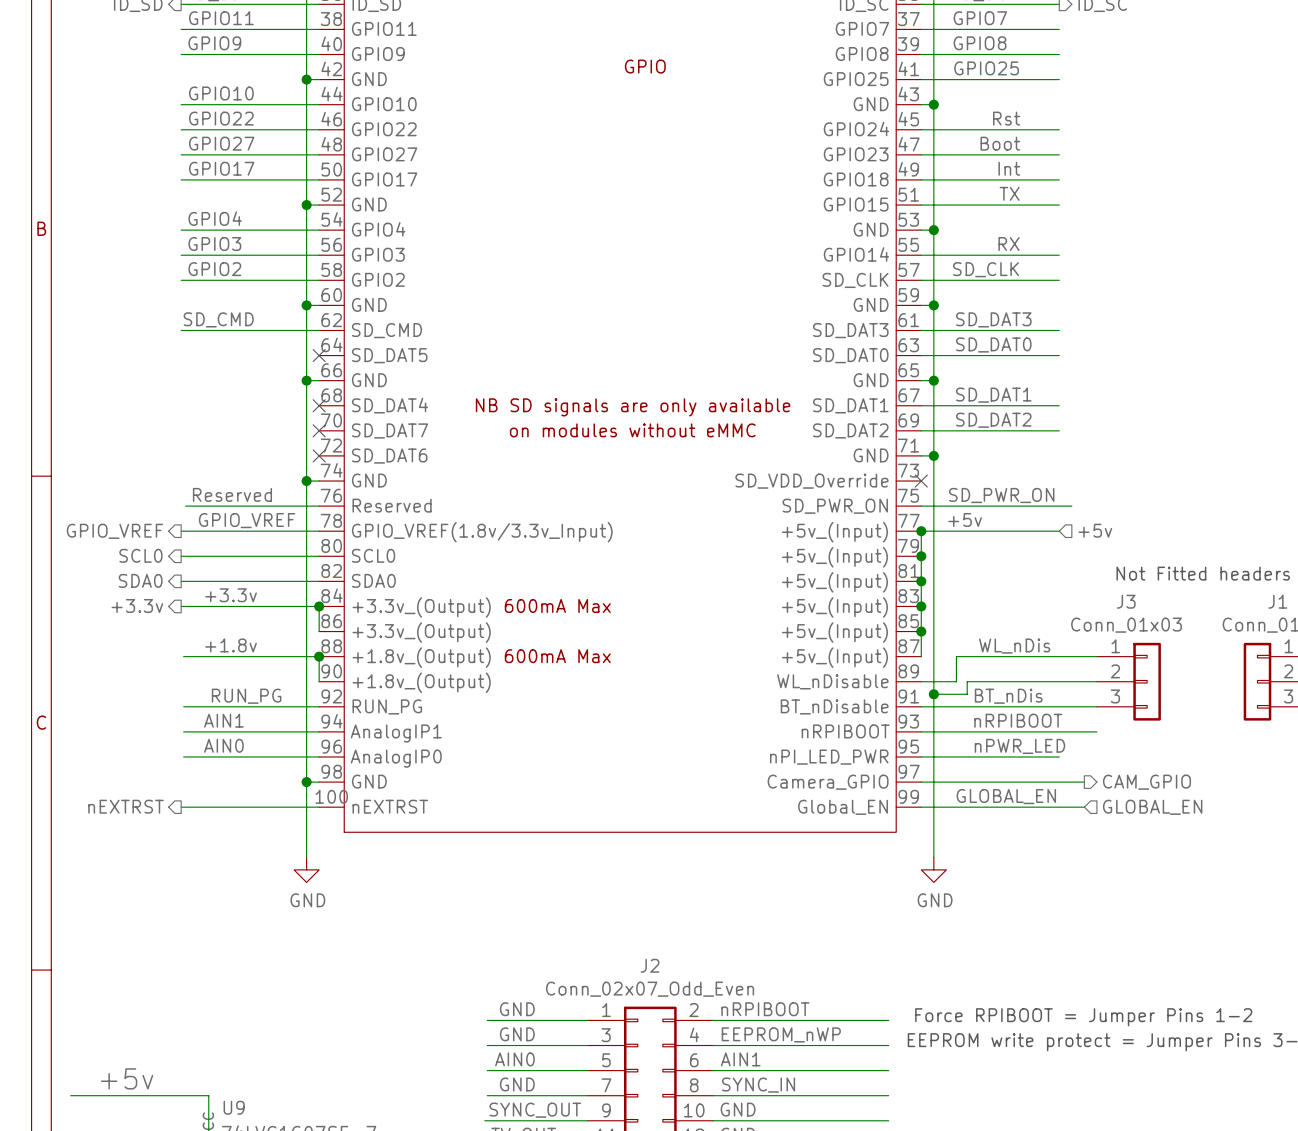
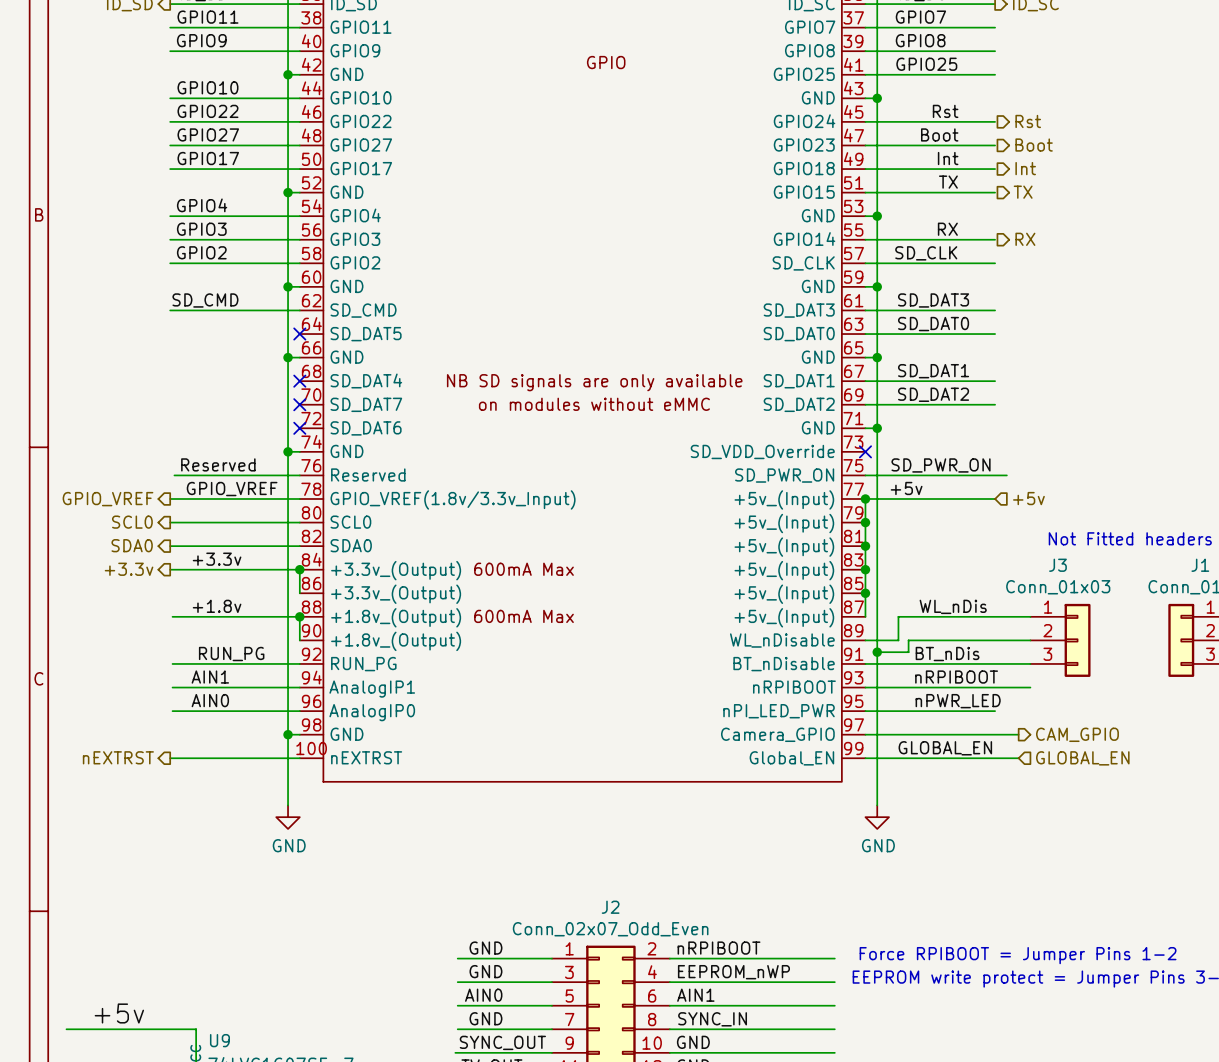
hierarchical label: none -> Rst (1028, 121)
hierarchical label: none -> Boot (1034, 145)
hierarchical label: none -> Int (1025, 168)
hierarchical label: none -> TX (1023, 192)
hierarchical label: none -> RX (1025, 239)

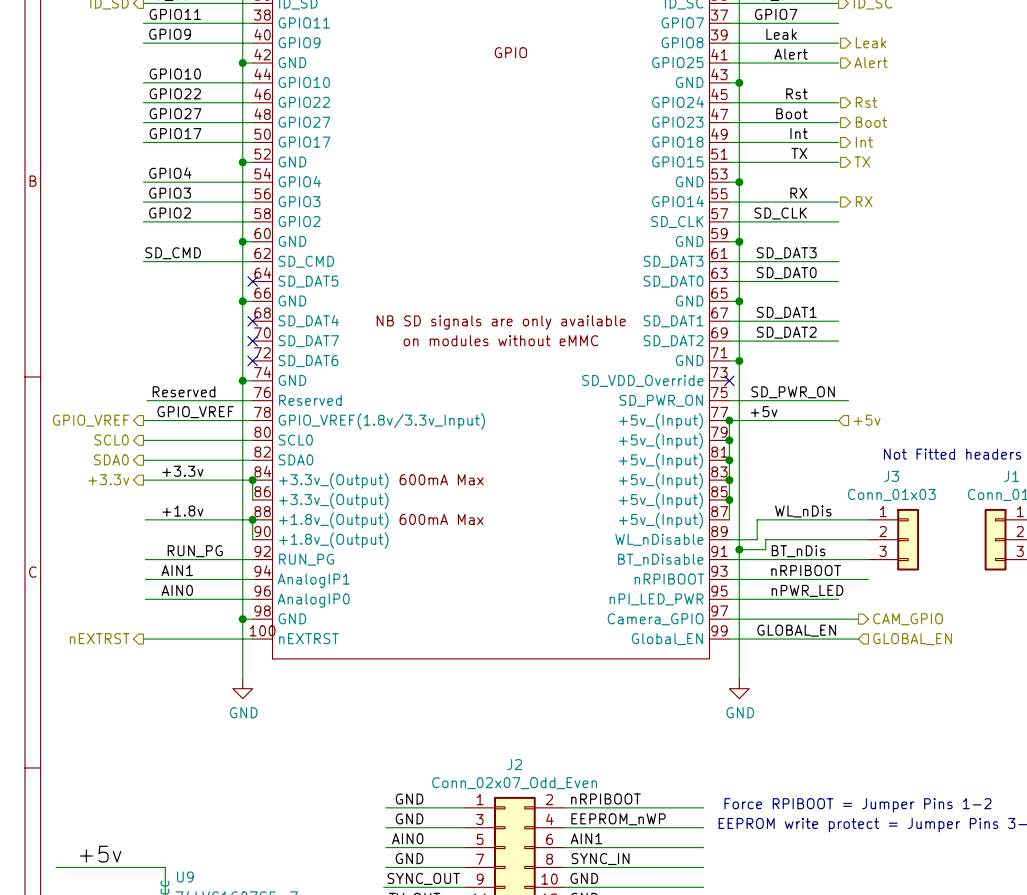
label: GPIO8 (920, 40) -> Leak (781, 34)
hierarchical label: none -> Leak (871, 42)
label: GPIO25 (926, 64) -> Alert (791, 54)
hierarchical label: none -> Alert (871, 62)

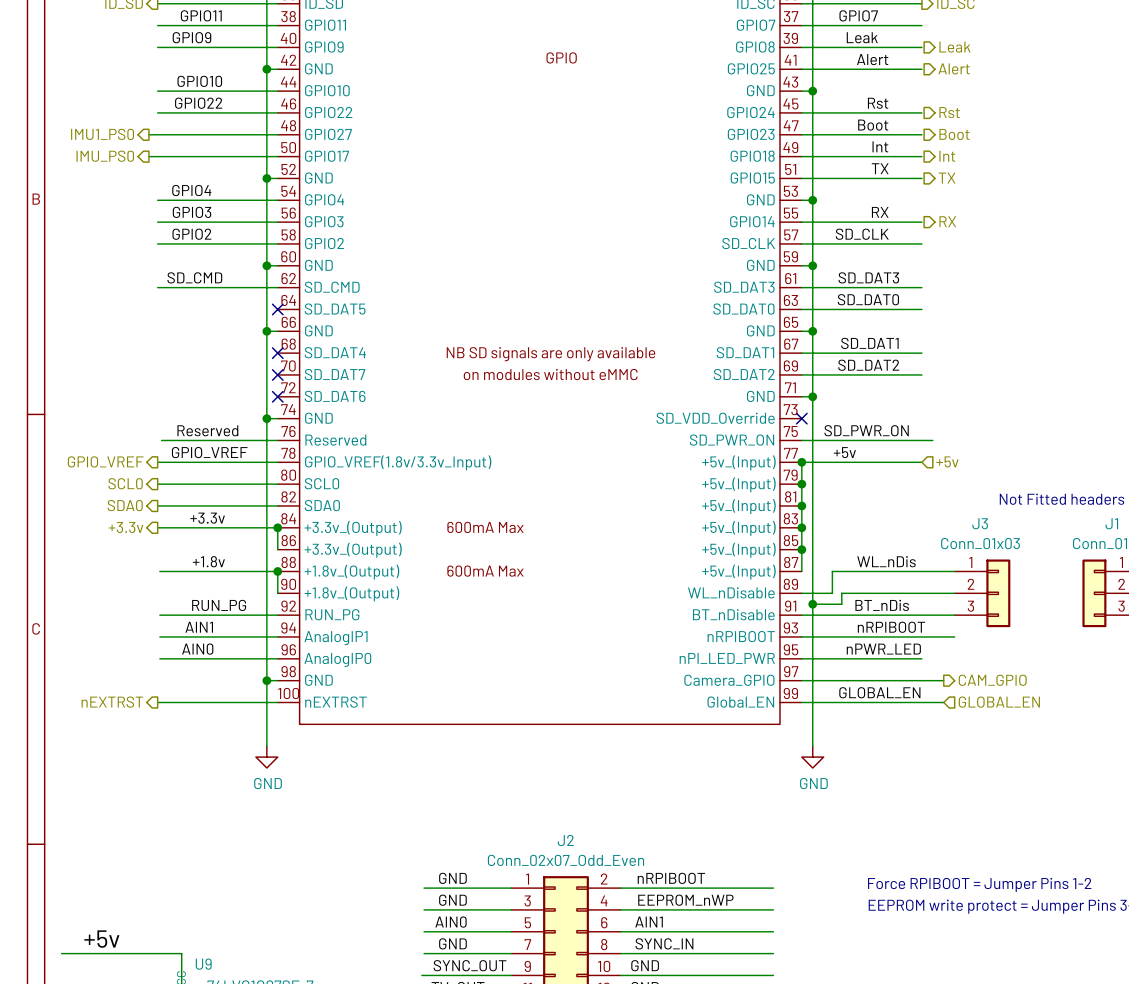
label: GPIO27 (175, 113) -> none
hierarchical label: none -> IMU1_PS0 (102, 134)
wire: none -> (148, 134) (157, 134)
label: GPIO17 (175, 133) -> none
hierarchical label: none -> IMU_PS0 (105, 156)
wire: none -> (148, 156) (157, 156)

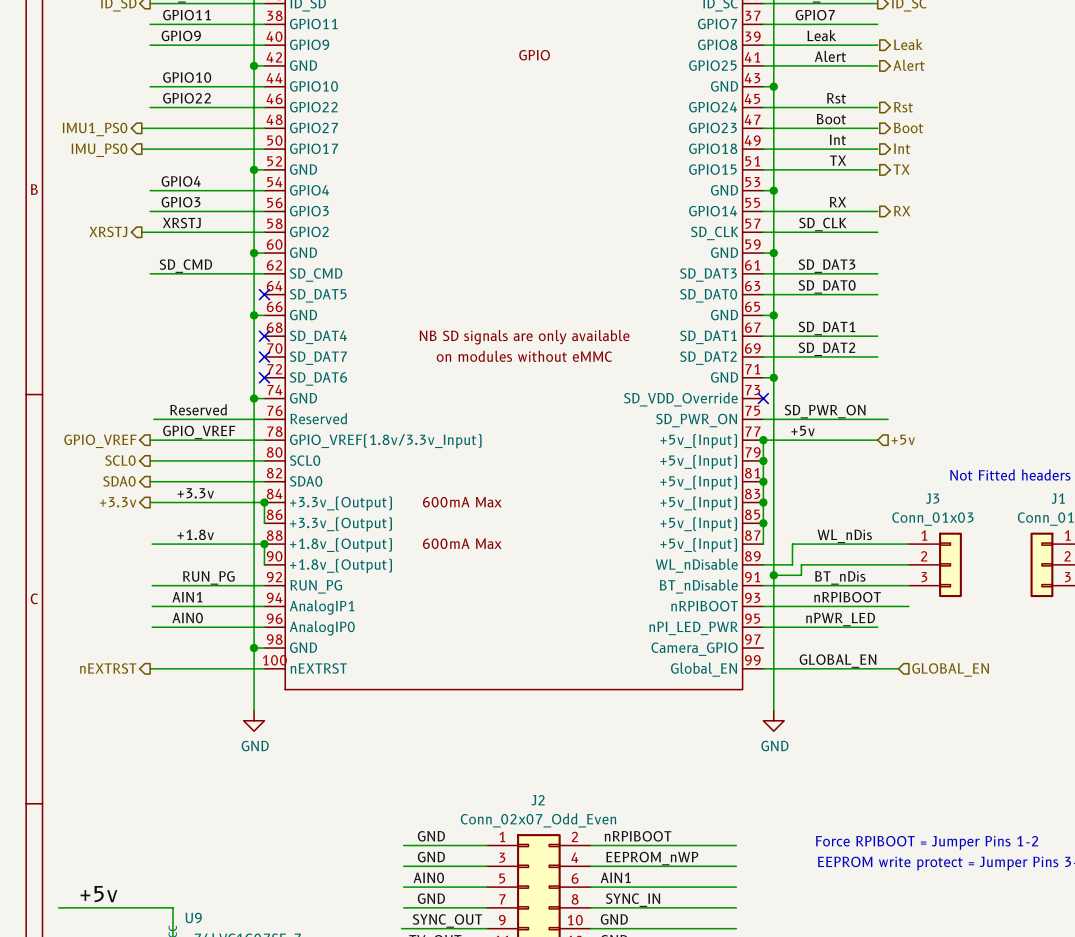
label: GPIO2 (191, 234) -> XRSTJ (181, 223)
hierarchical label: none -> XRSTJ (108, 231)
wire: none -> (141, 232) (150, 232)
wire: (801, 680) (943, 680) -> none
hierarchical label: CAM_GPIO (992, 680) -> none

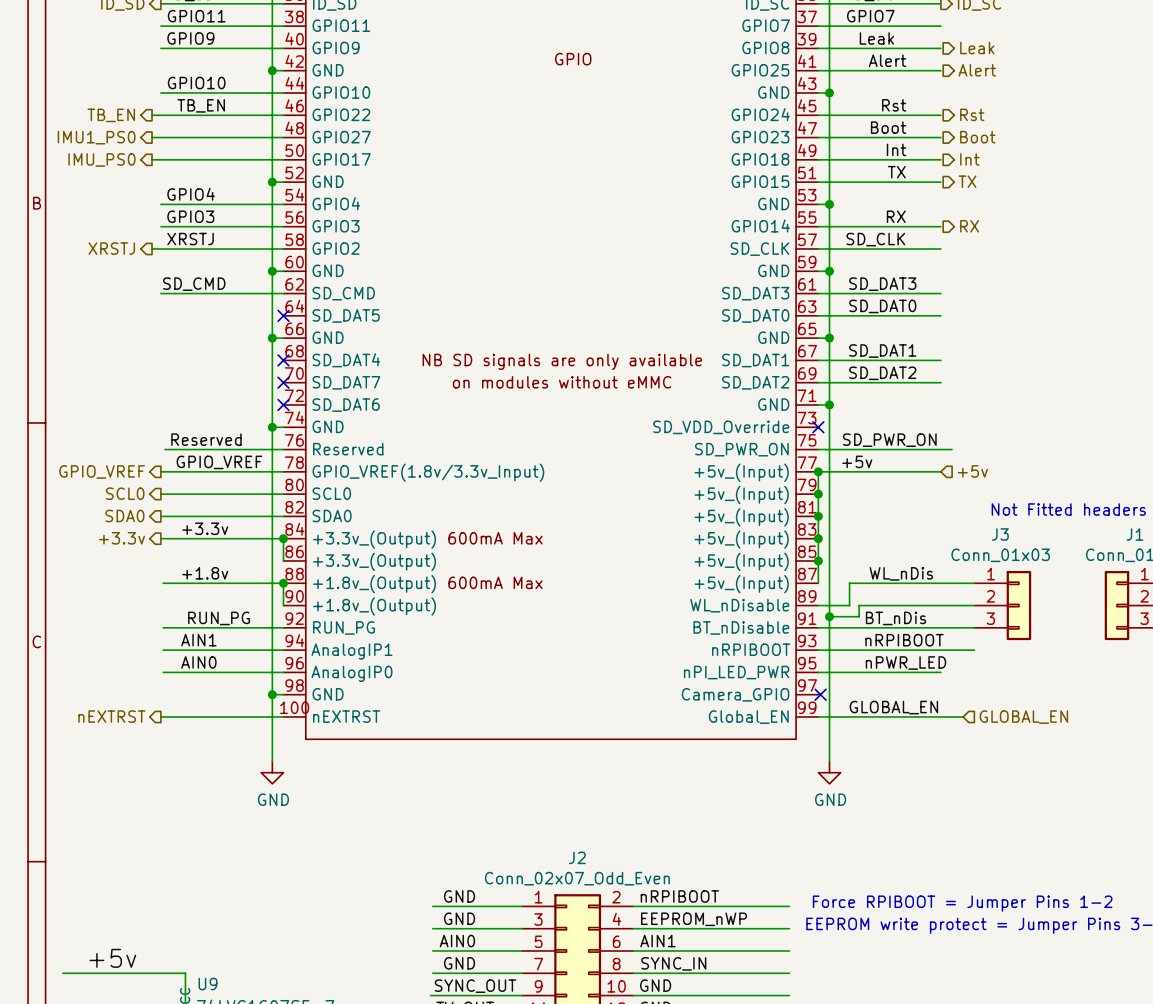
label: GPIO22 (186, 98) -> TB_EN (201, 105)
wire: none -> (152, 115) (160, 115)
hierarchical label: none -> TB_EN (111, 115)
no-connect mark: none -> (820, 694)

